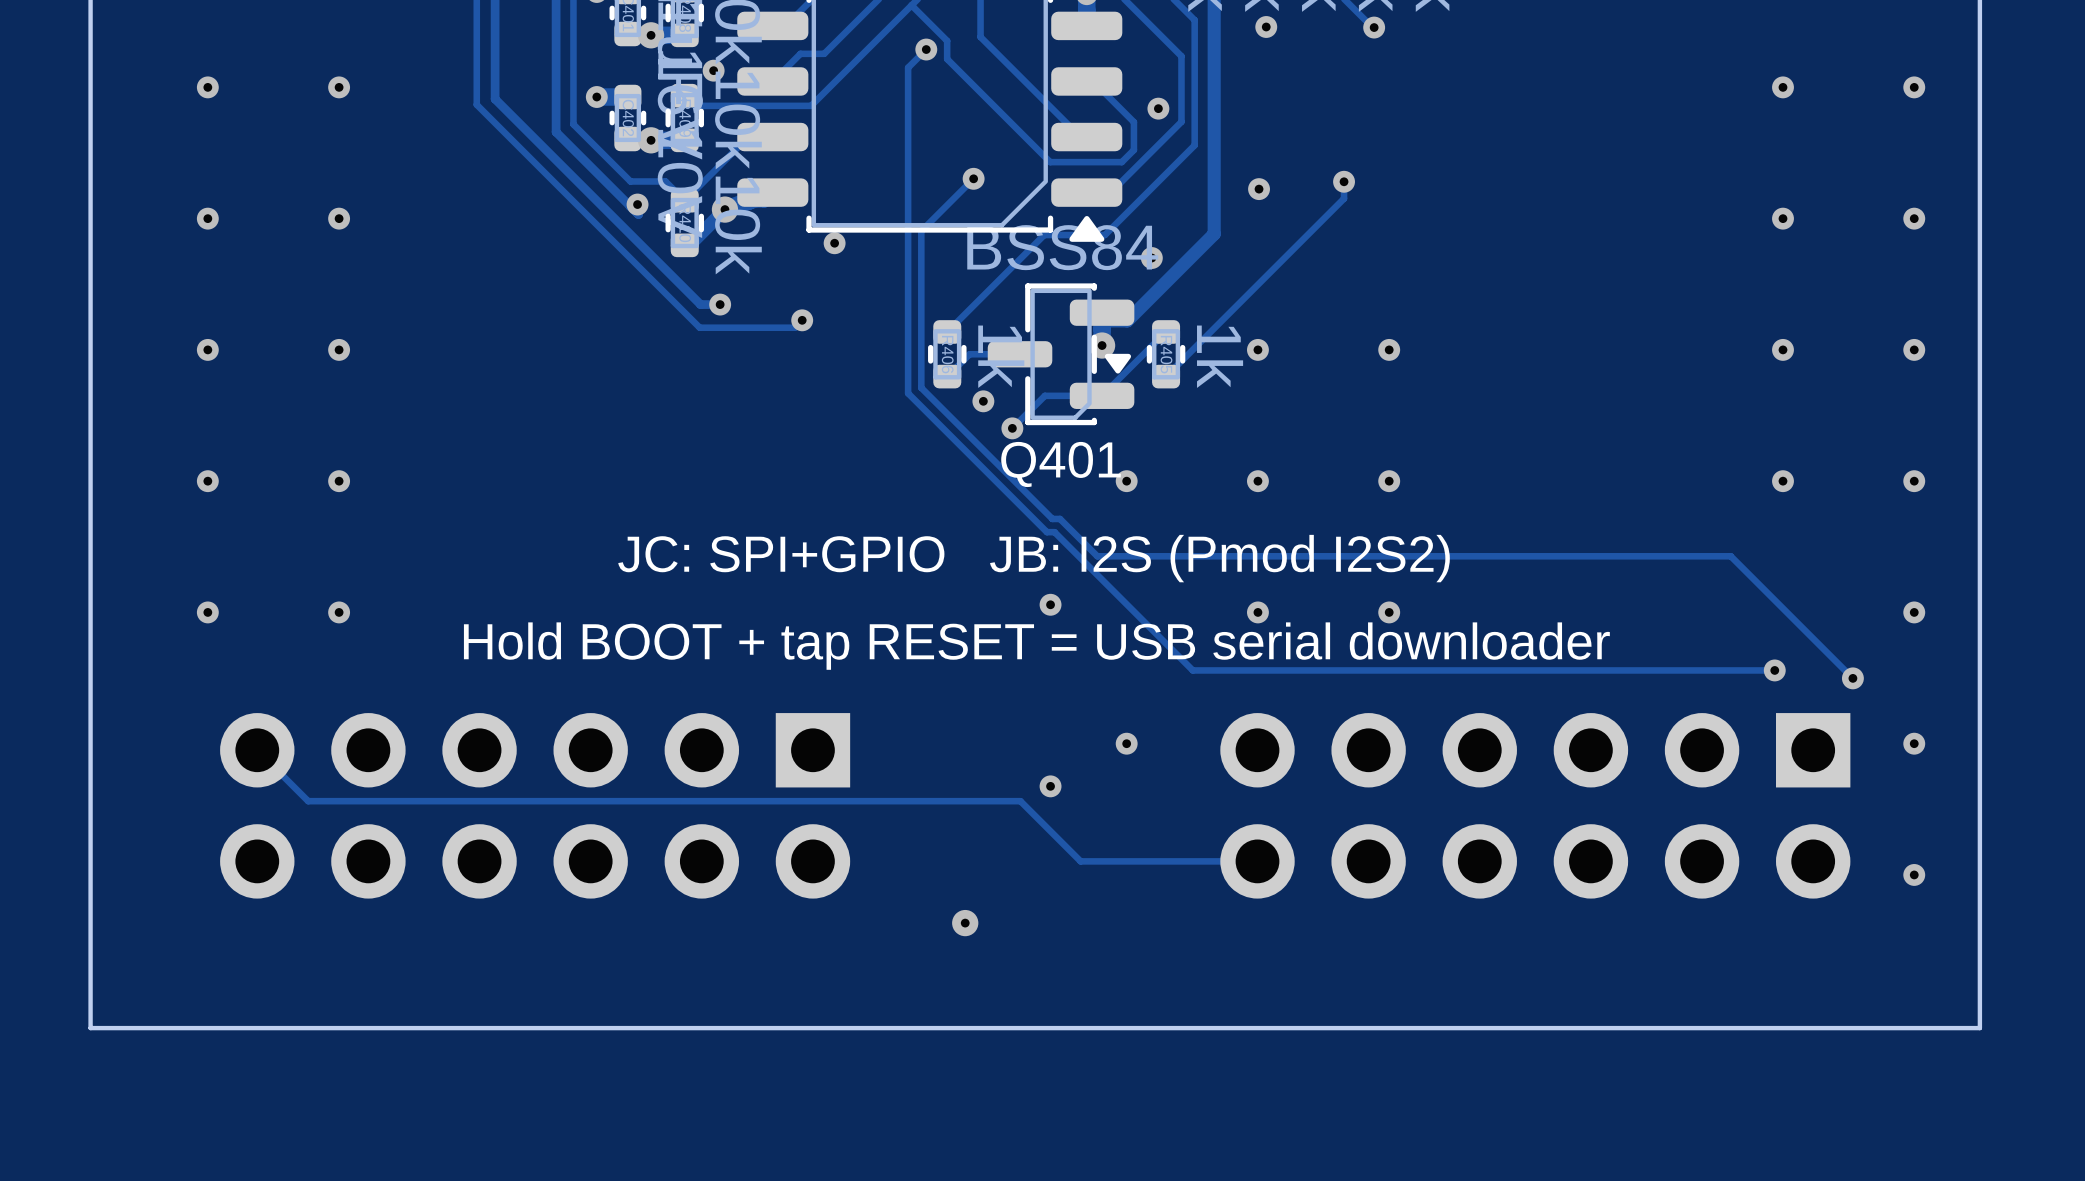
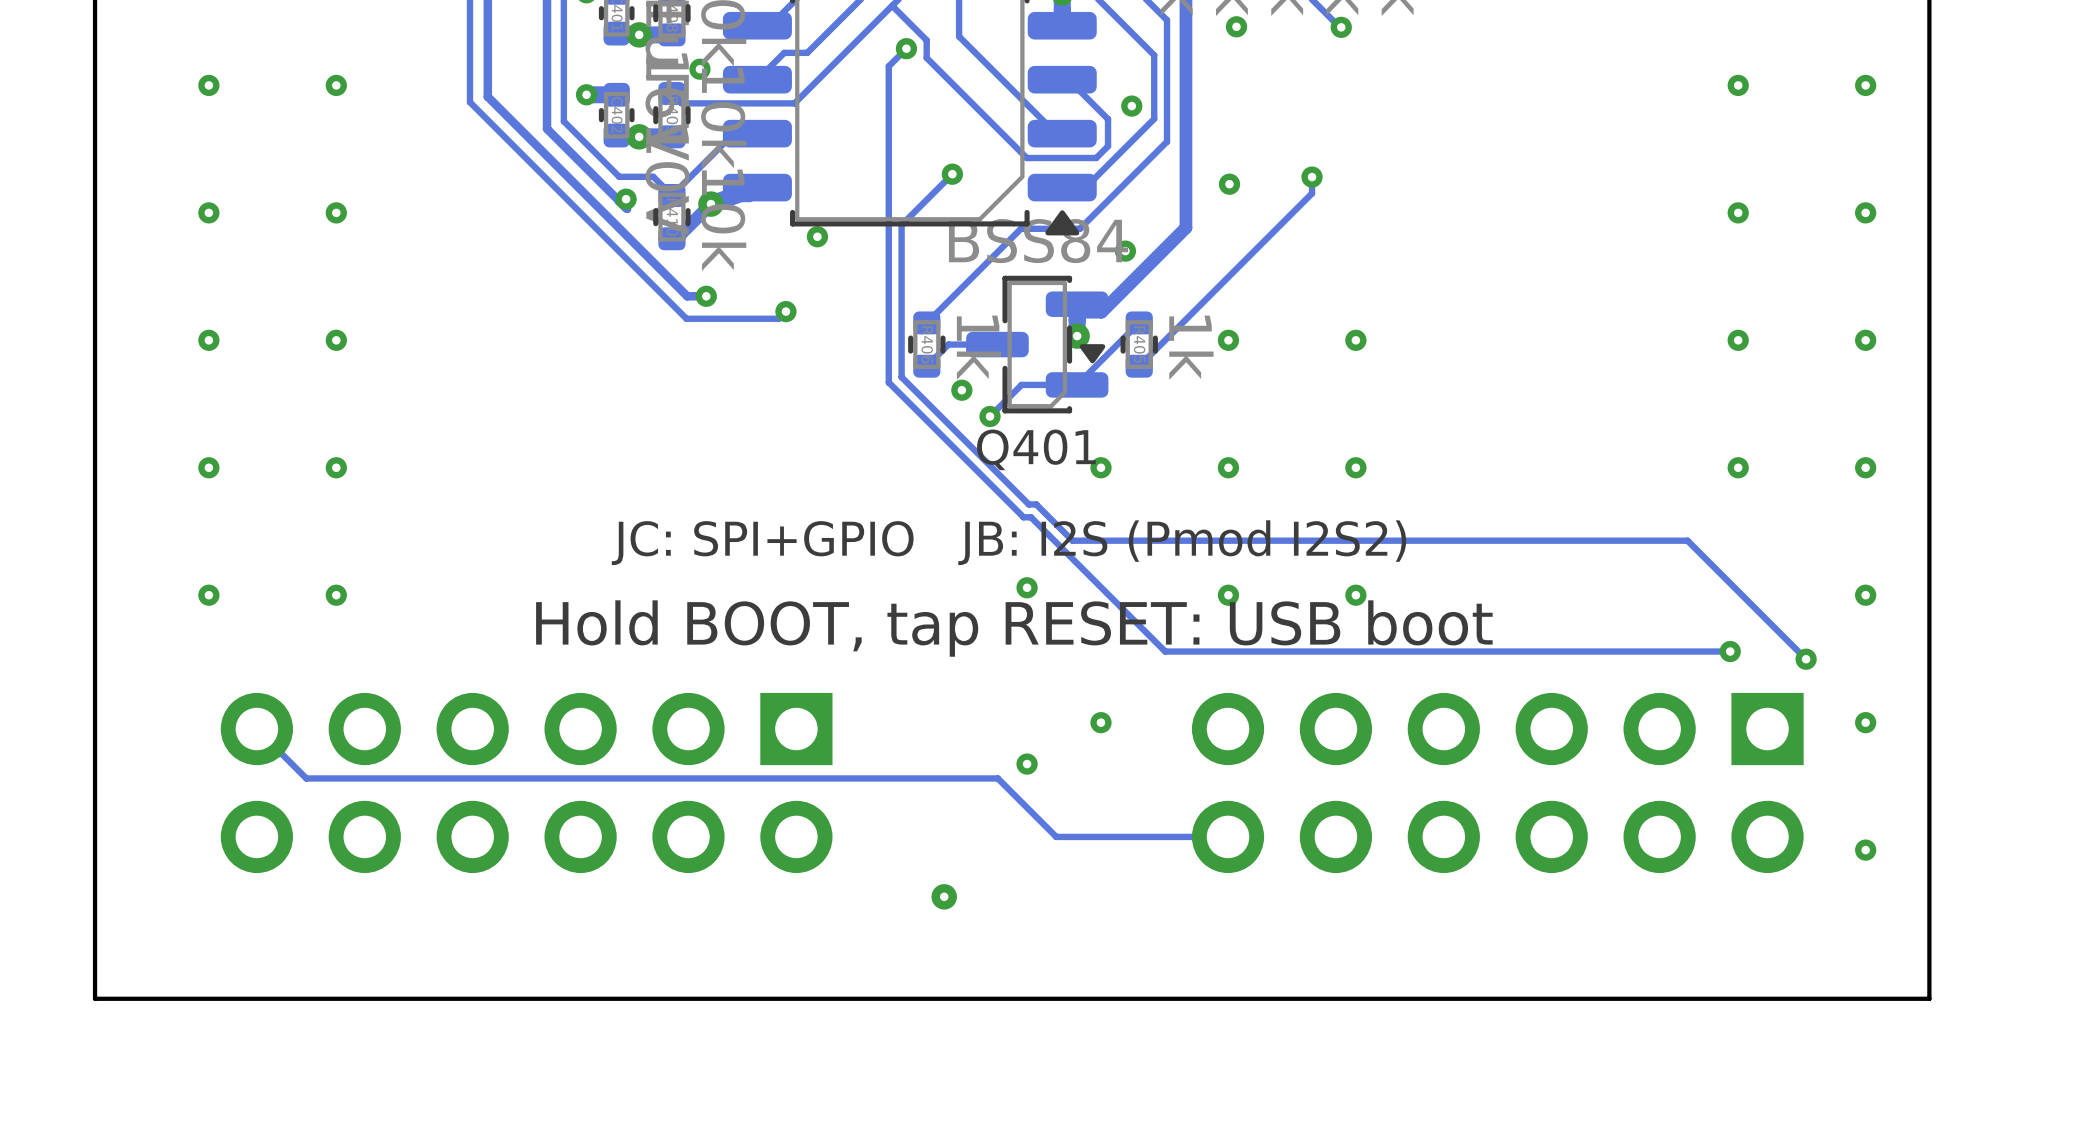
text: Hold BOOT + tap RESET = USB serial downloader (1036, 646) -> Hold BOOT, tap RESET: USB boot (1014, 628)

